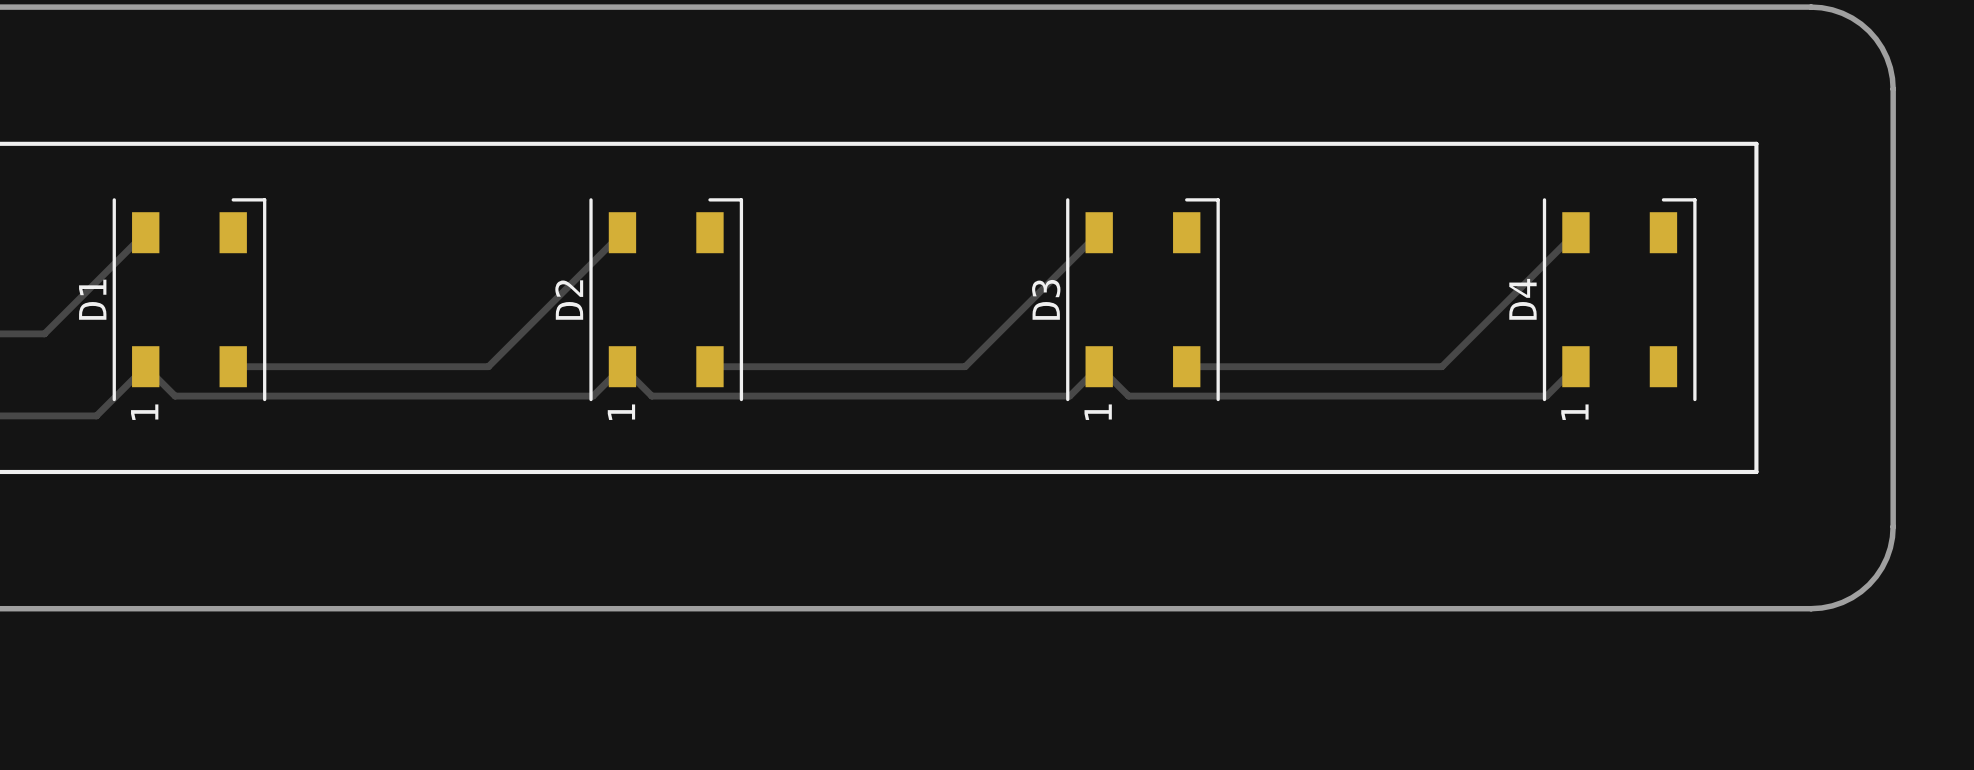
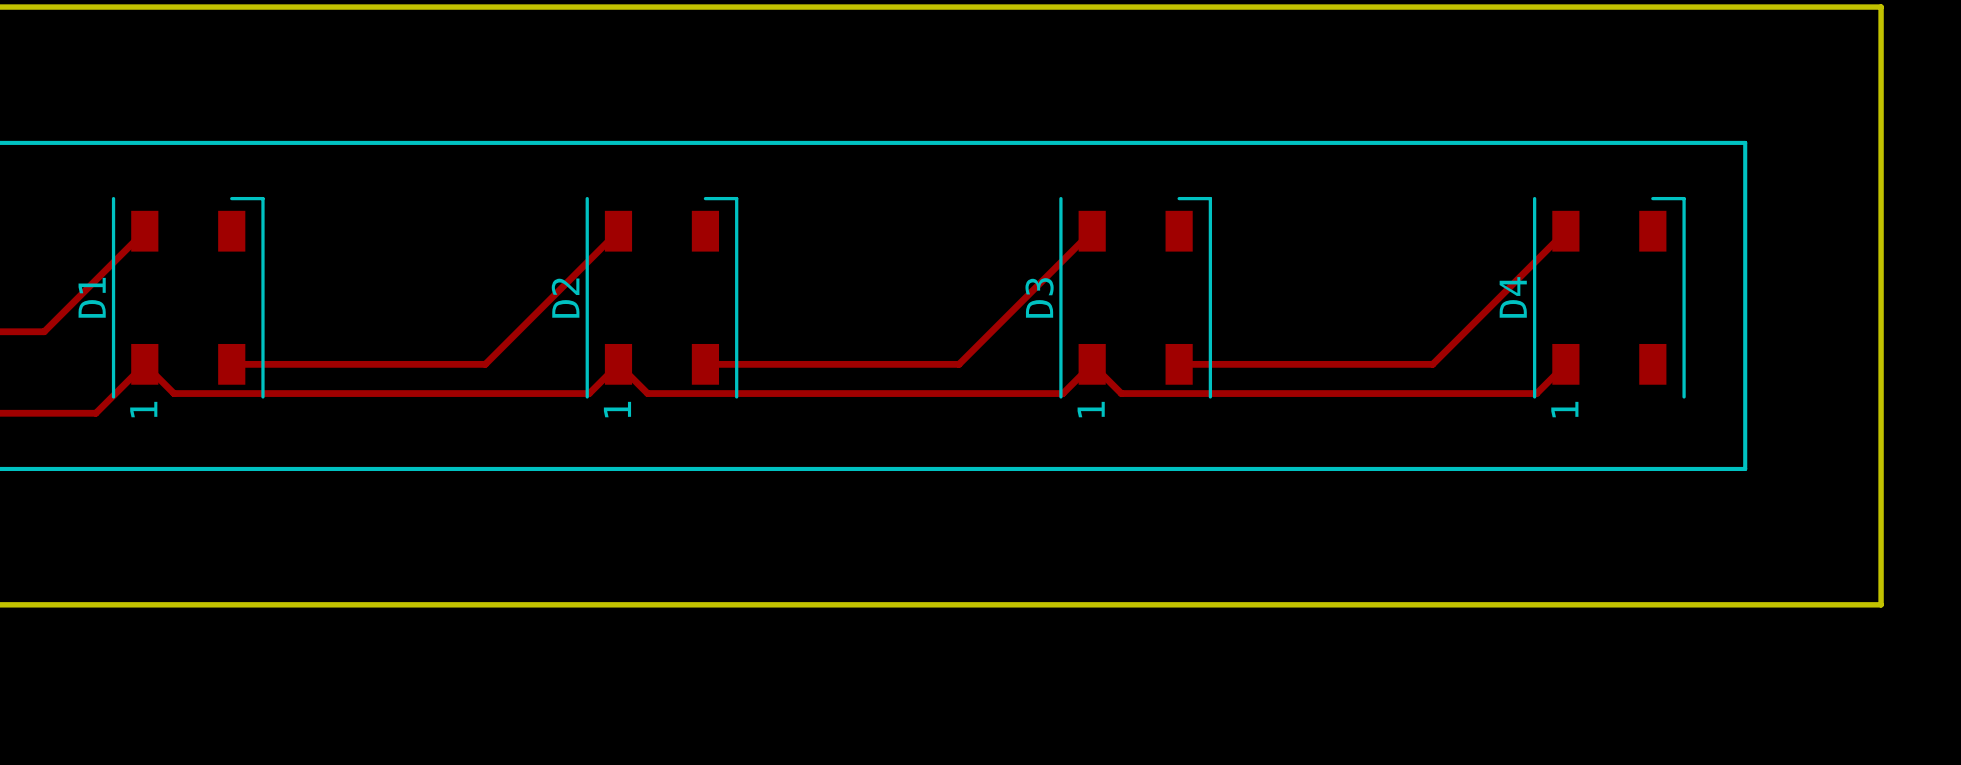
board edge: (1811, 7) (1842, 13) (1869, 31) (1886, 57) (1893, 89) -> (1799, 7) (1881, 7) (1881, 88)
board edge: (1893, 526) (1886, 558) (1869, 584) (1842, 602) (1811, 608) -> (1881, 523) (1881, 604) (1799, 604)

